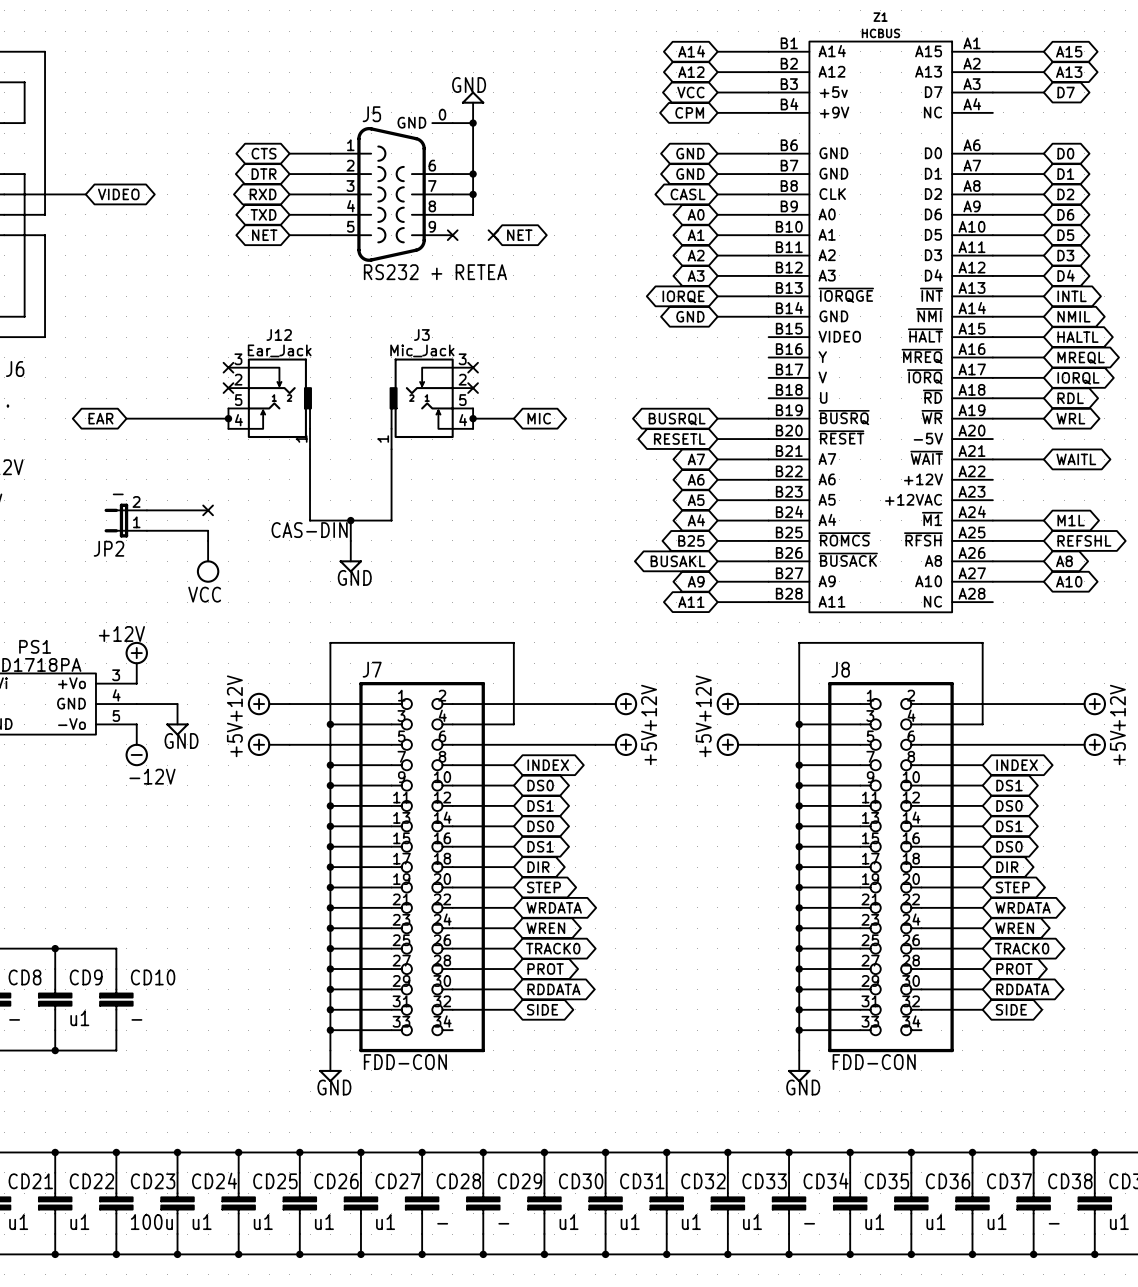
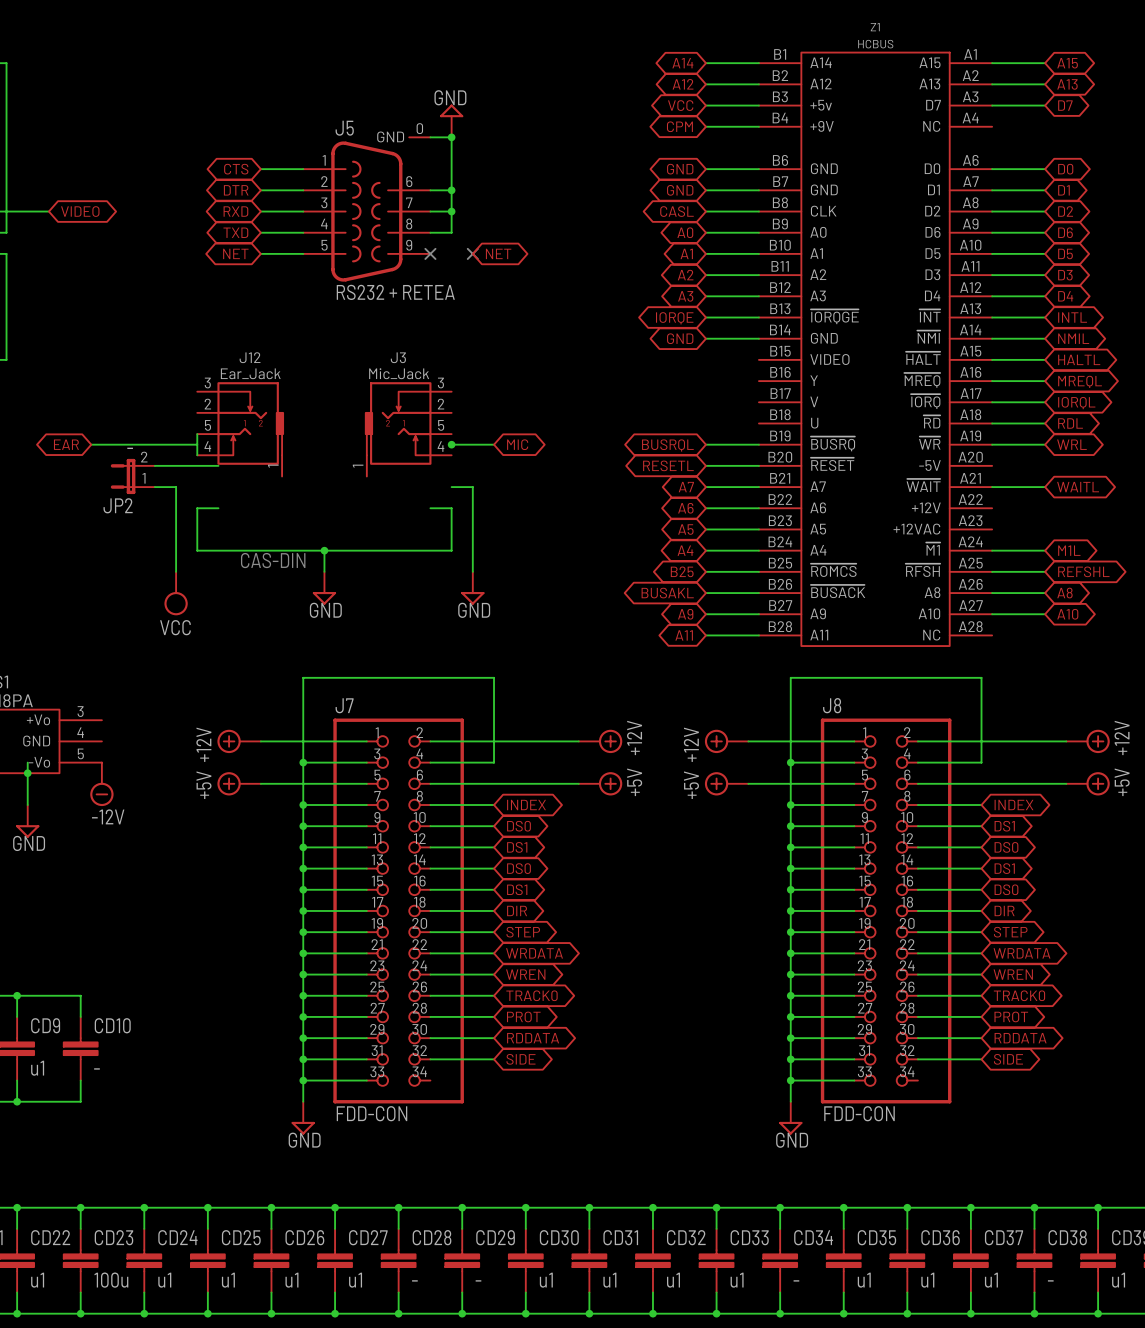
no-connect mark: (228, 367) -> none
no-connect mark: (473, 367) -> none
no-connect mark: (228, 388) -> none
no-connect mark: (473, 388) -> none
wire: (473, 408) (473, 428) -> none
junction: (228, 418) -> none
wire: (310, 449) (310, 520) -> (218, 508) (197, 508) (197, 550) (282, 550)
wire: (391, 449) (391, 520) -> (430, 508) (451, 508) (451, 550) (366, 550)
wire: none -> (451, 487) (472, 487) (472, 571)
wire: (146, 510) (208, 510) -> (154, 465) (218, 465)
no-connect mark: (208, 510) -> none
JP2 position: (125, 520) -> (132, 476)
wire: (146, 530) (208, 530) -> (154, 487) (176, 487) (176, 561)
power symbol: none -> GND (472, 588)
power symbol: +12V (136, 662) -> none
wire: (136, 704) (177, 704) -> none
power symbol: GND (177, 719) -> none
wire: none -> (27, 762) (27, 805)
junction: none -> (27, 773)
power symbol: none -> GND (27, 821)

